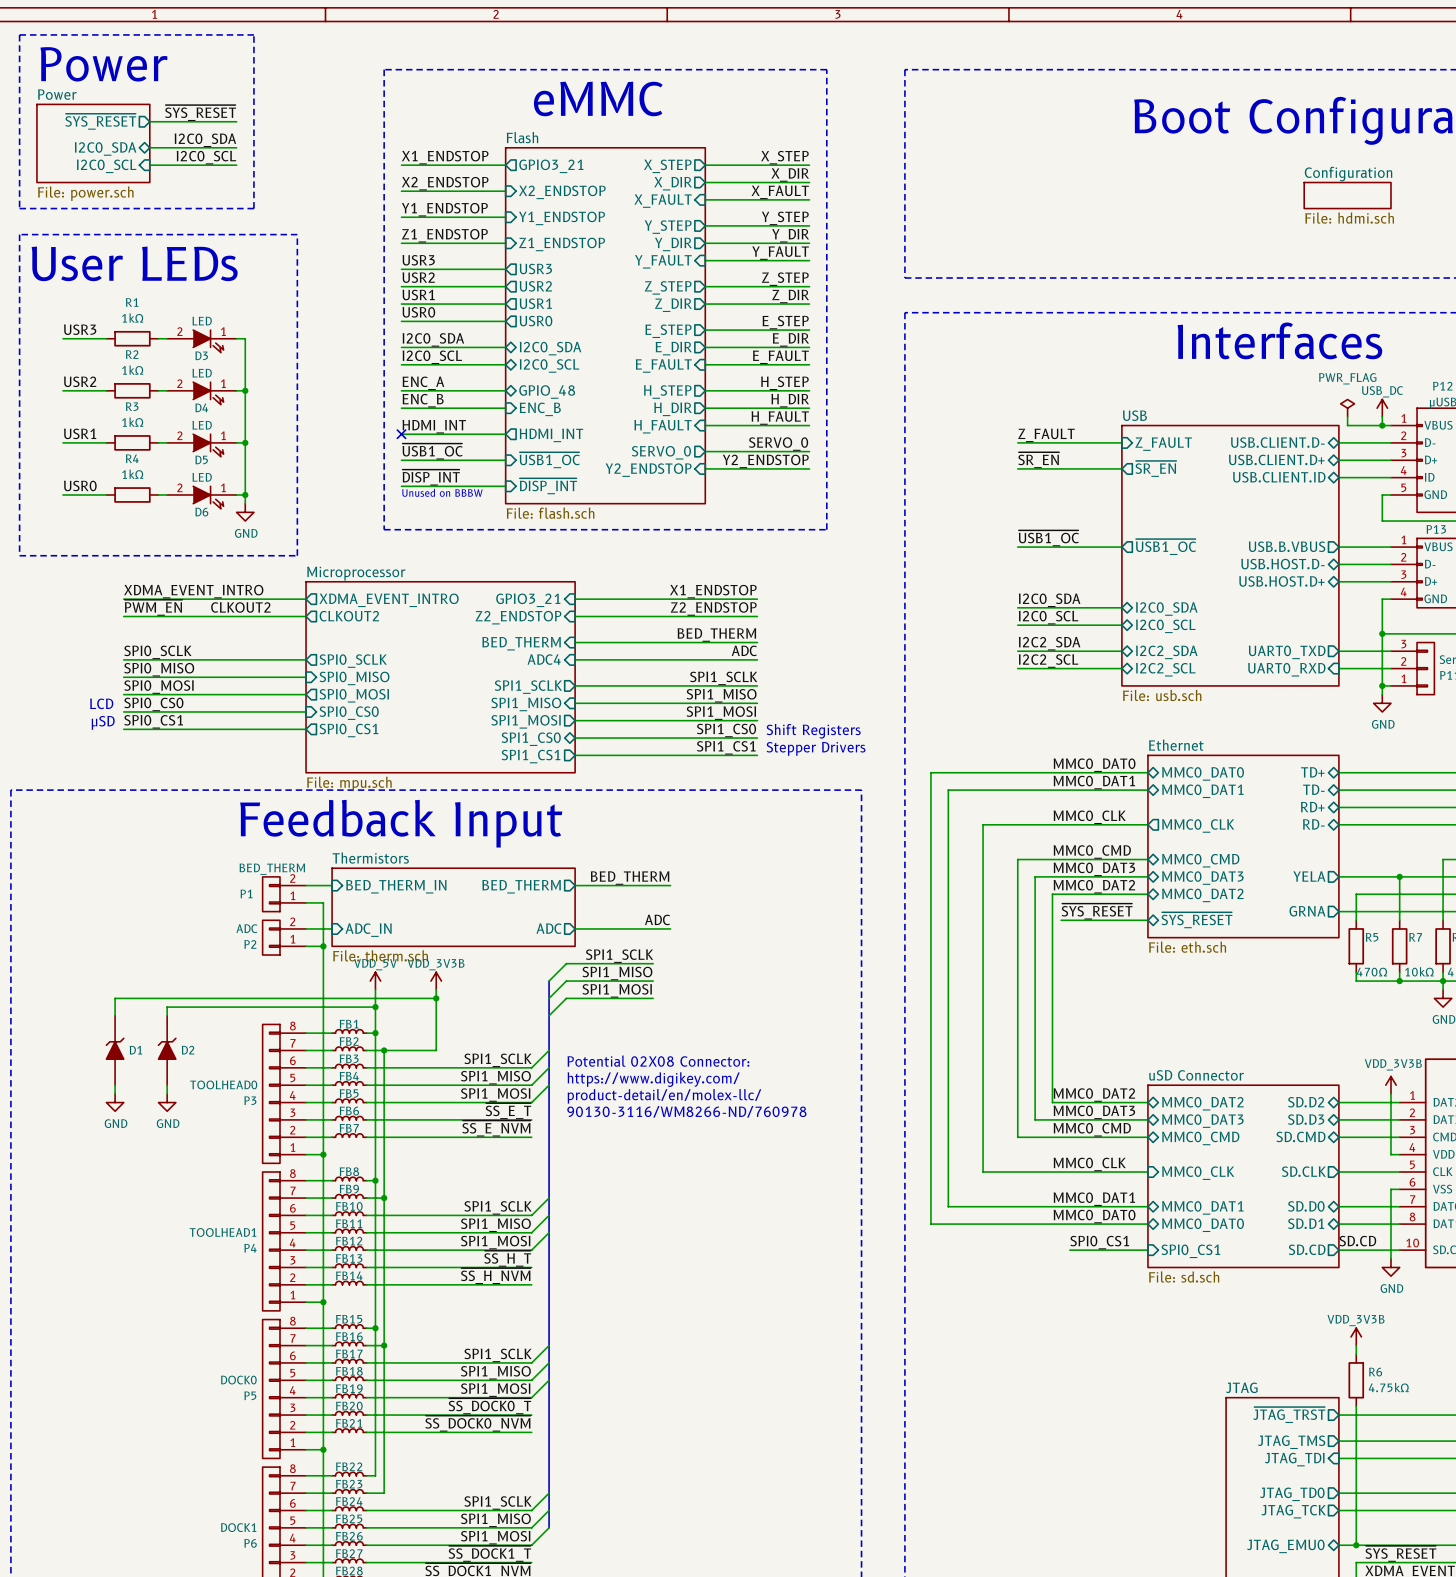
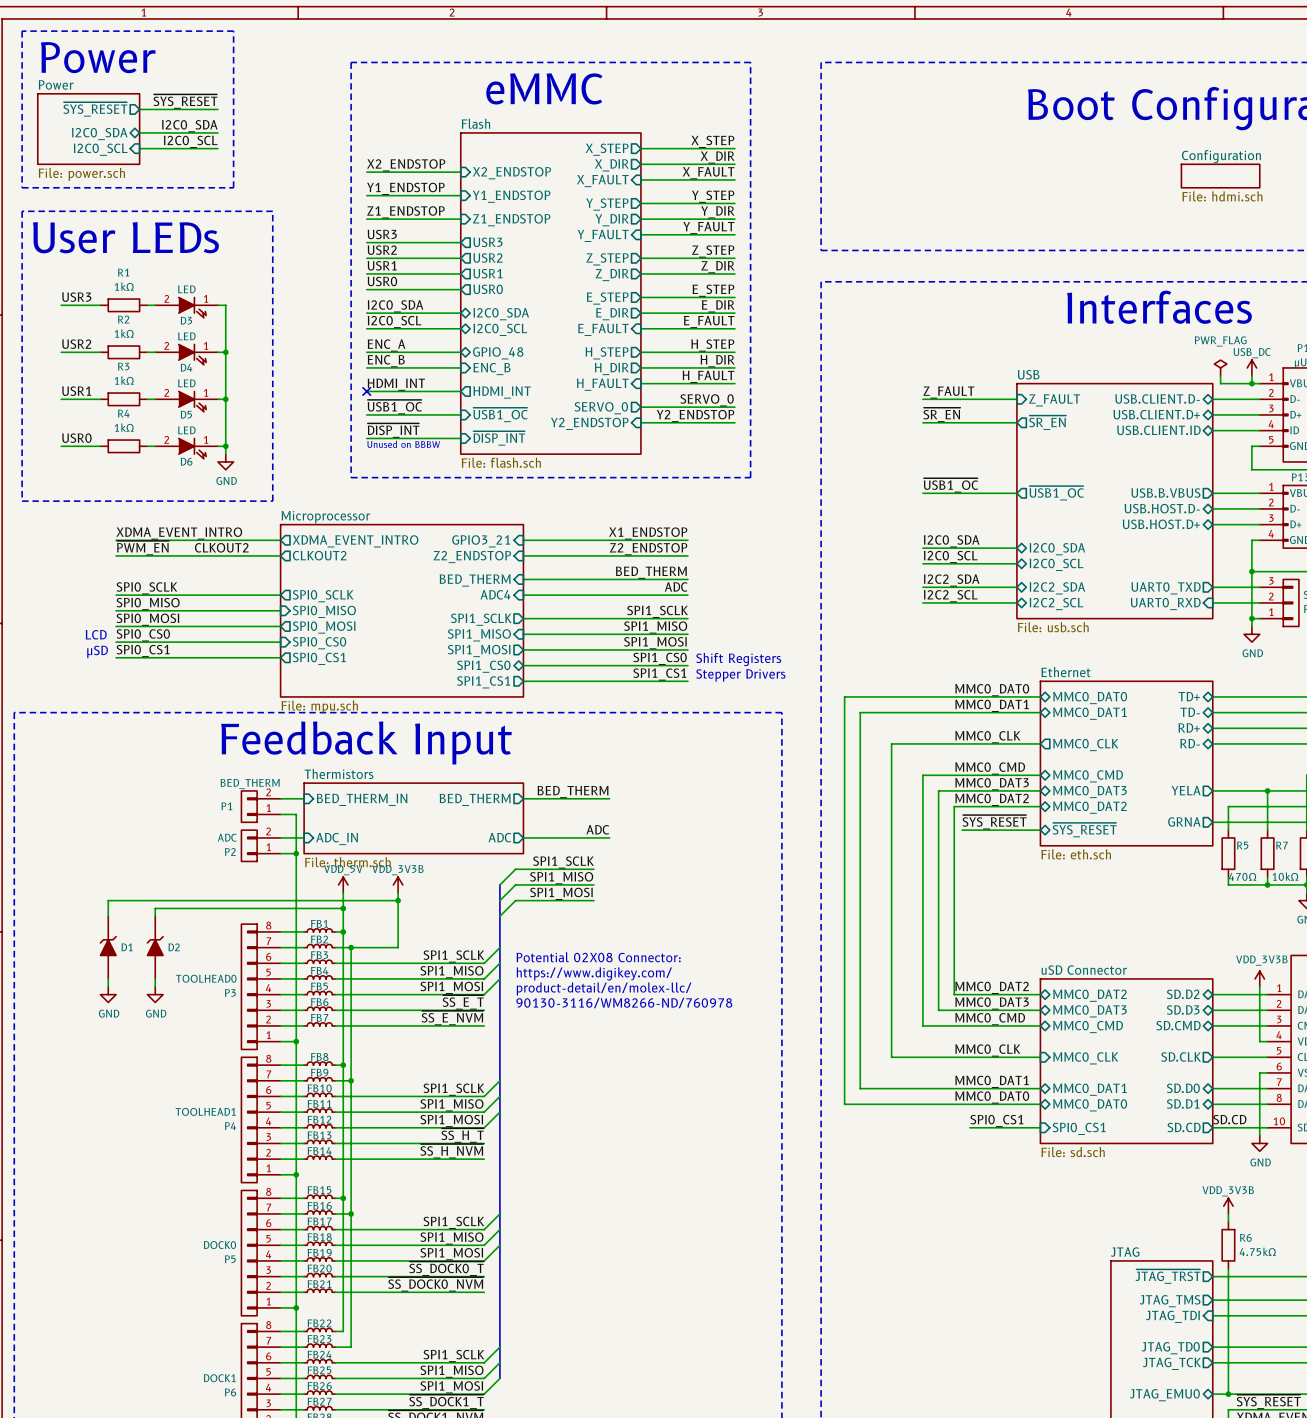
label: X1_ENDSTOP (445, 157) -> none
wire: (401, 165) (505, 165) -> none
sheet pin: GPIO3_21 (551, 166) -> none

